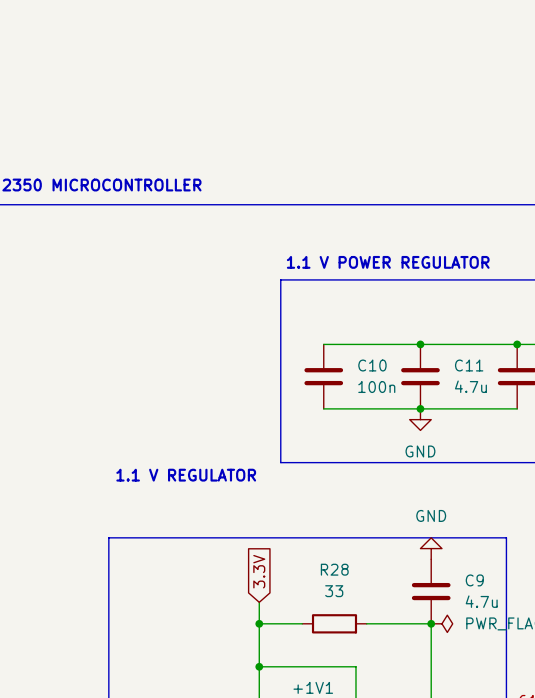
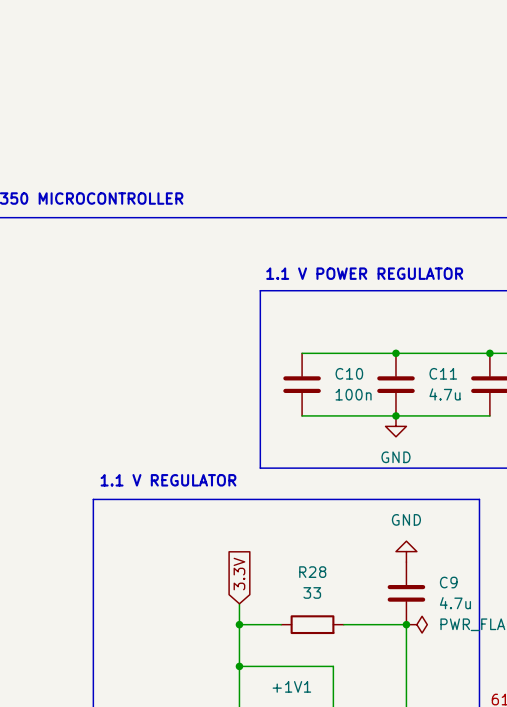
line: (108, 537) (506, 537) -> (93, 541) (93, 499) (479, 499) (479, 541)

